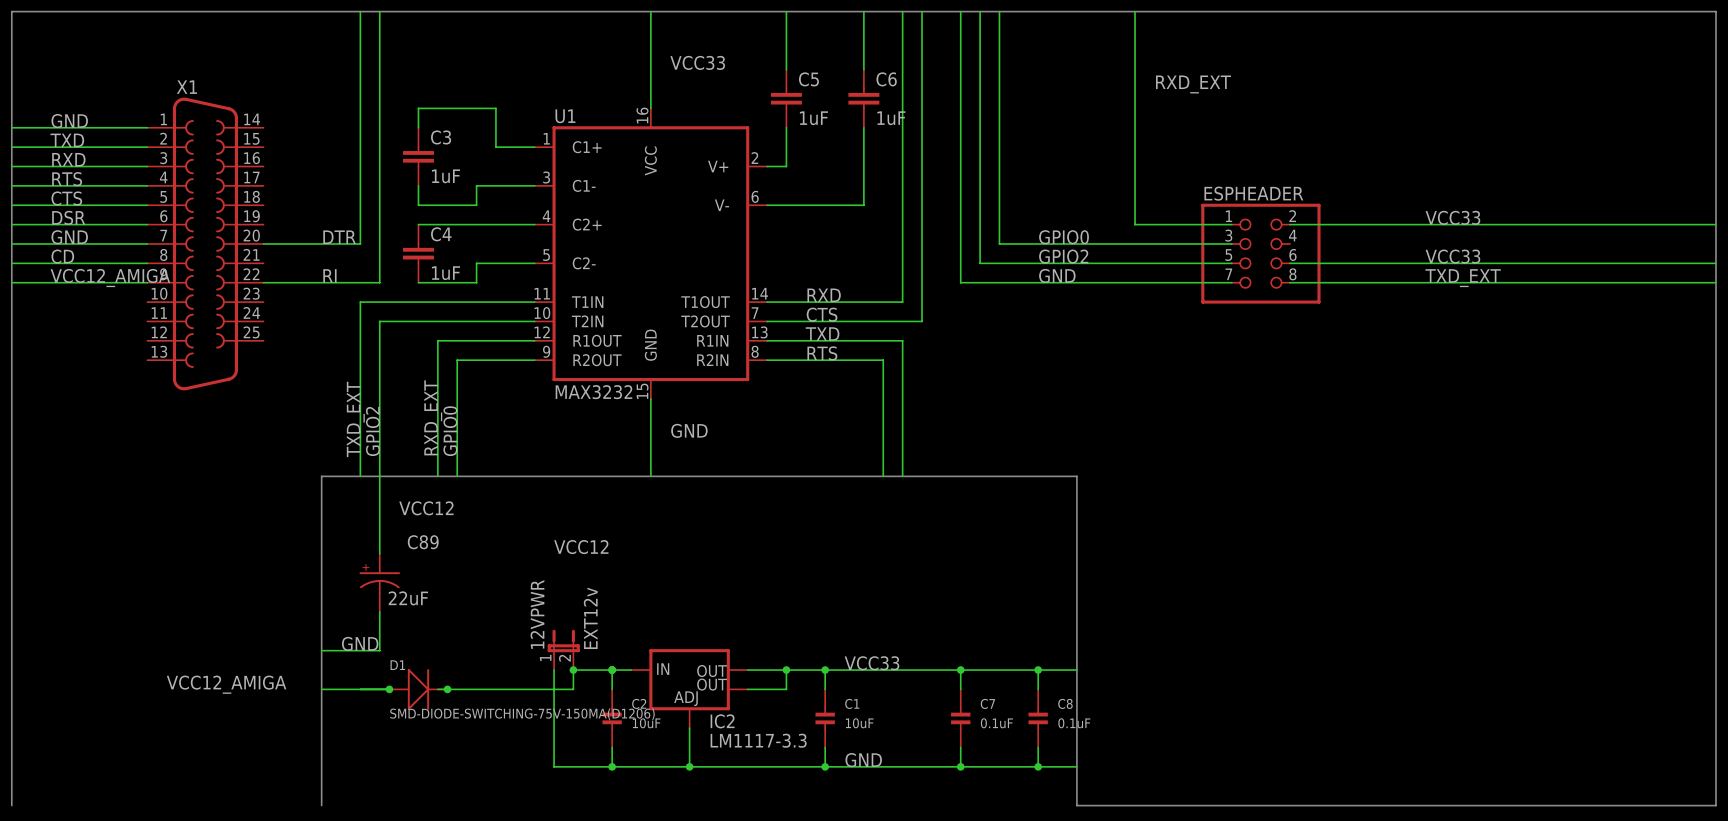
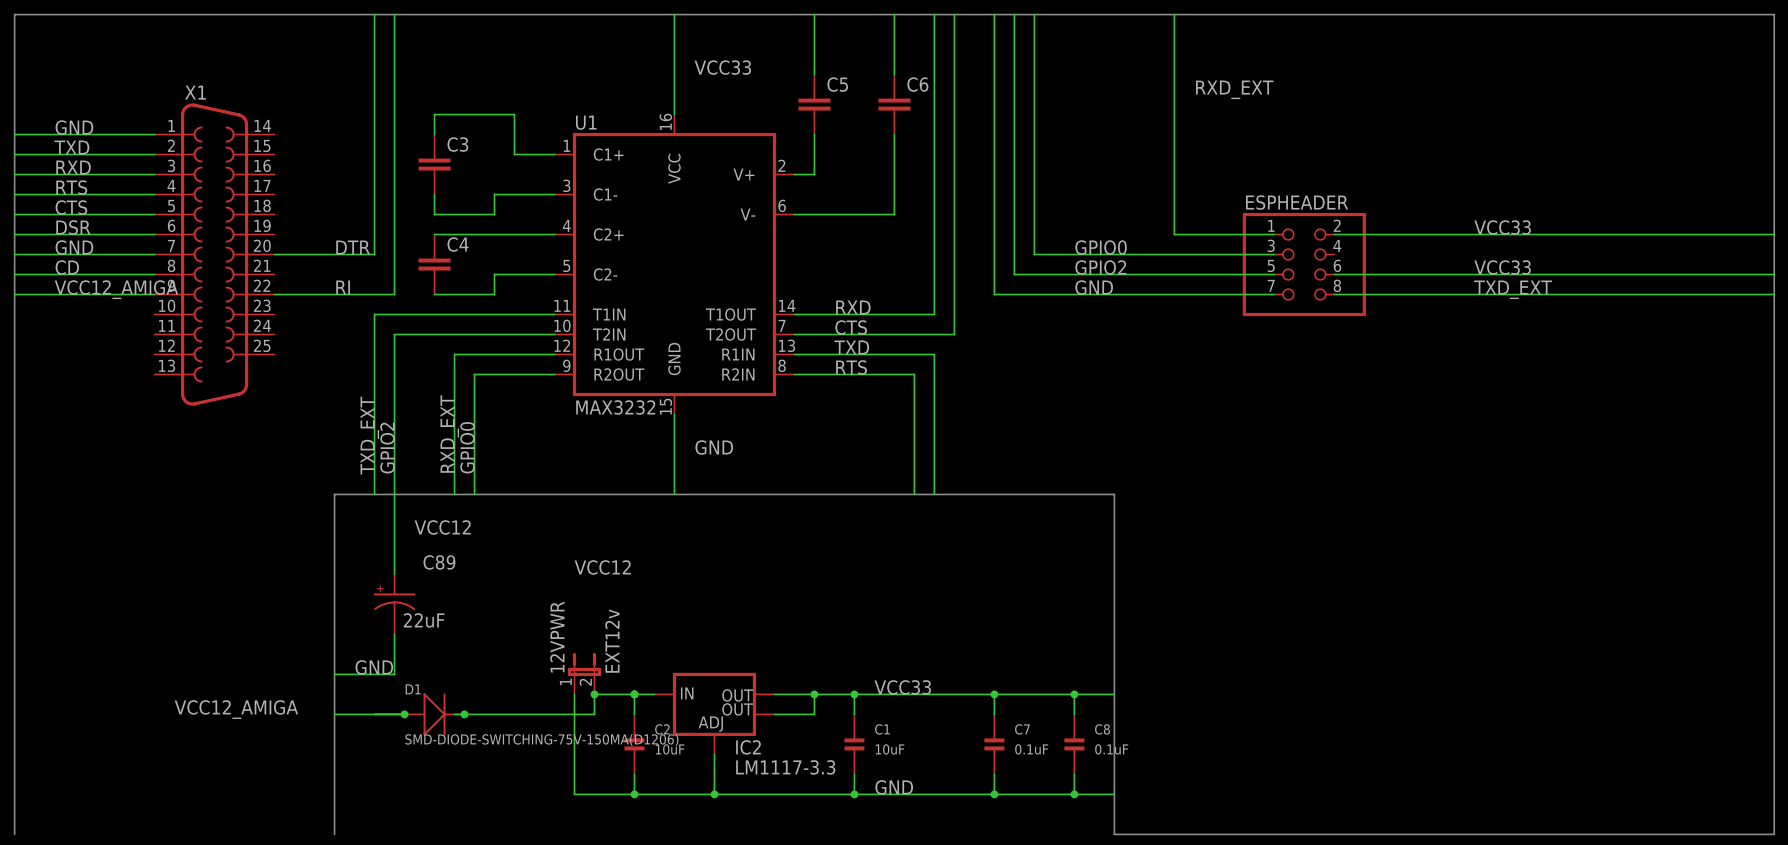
C5 value: 1uF (813, 118) -> none
C6 value: 1uF (891, 118) -> none
C3 value: 1uF (445, 176) -> none
C4 value: 1uF (445, 273) -> none

